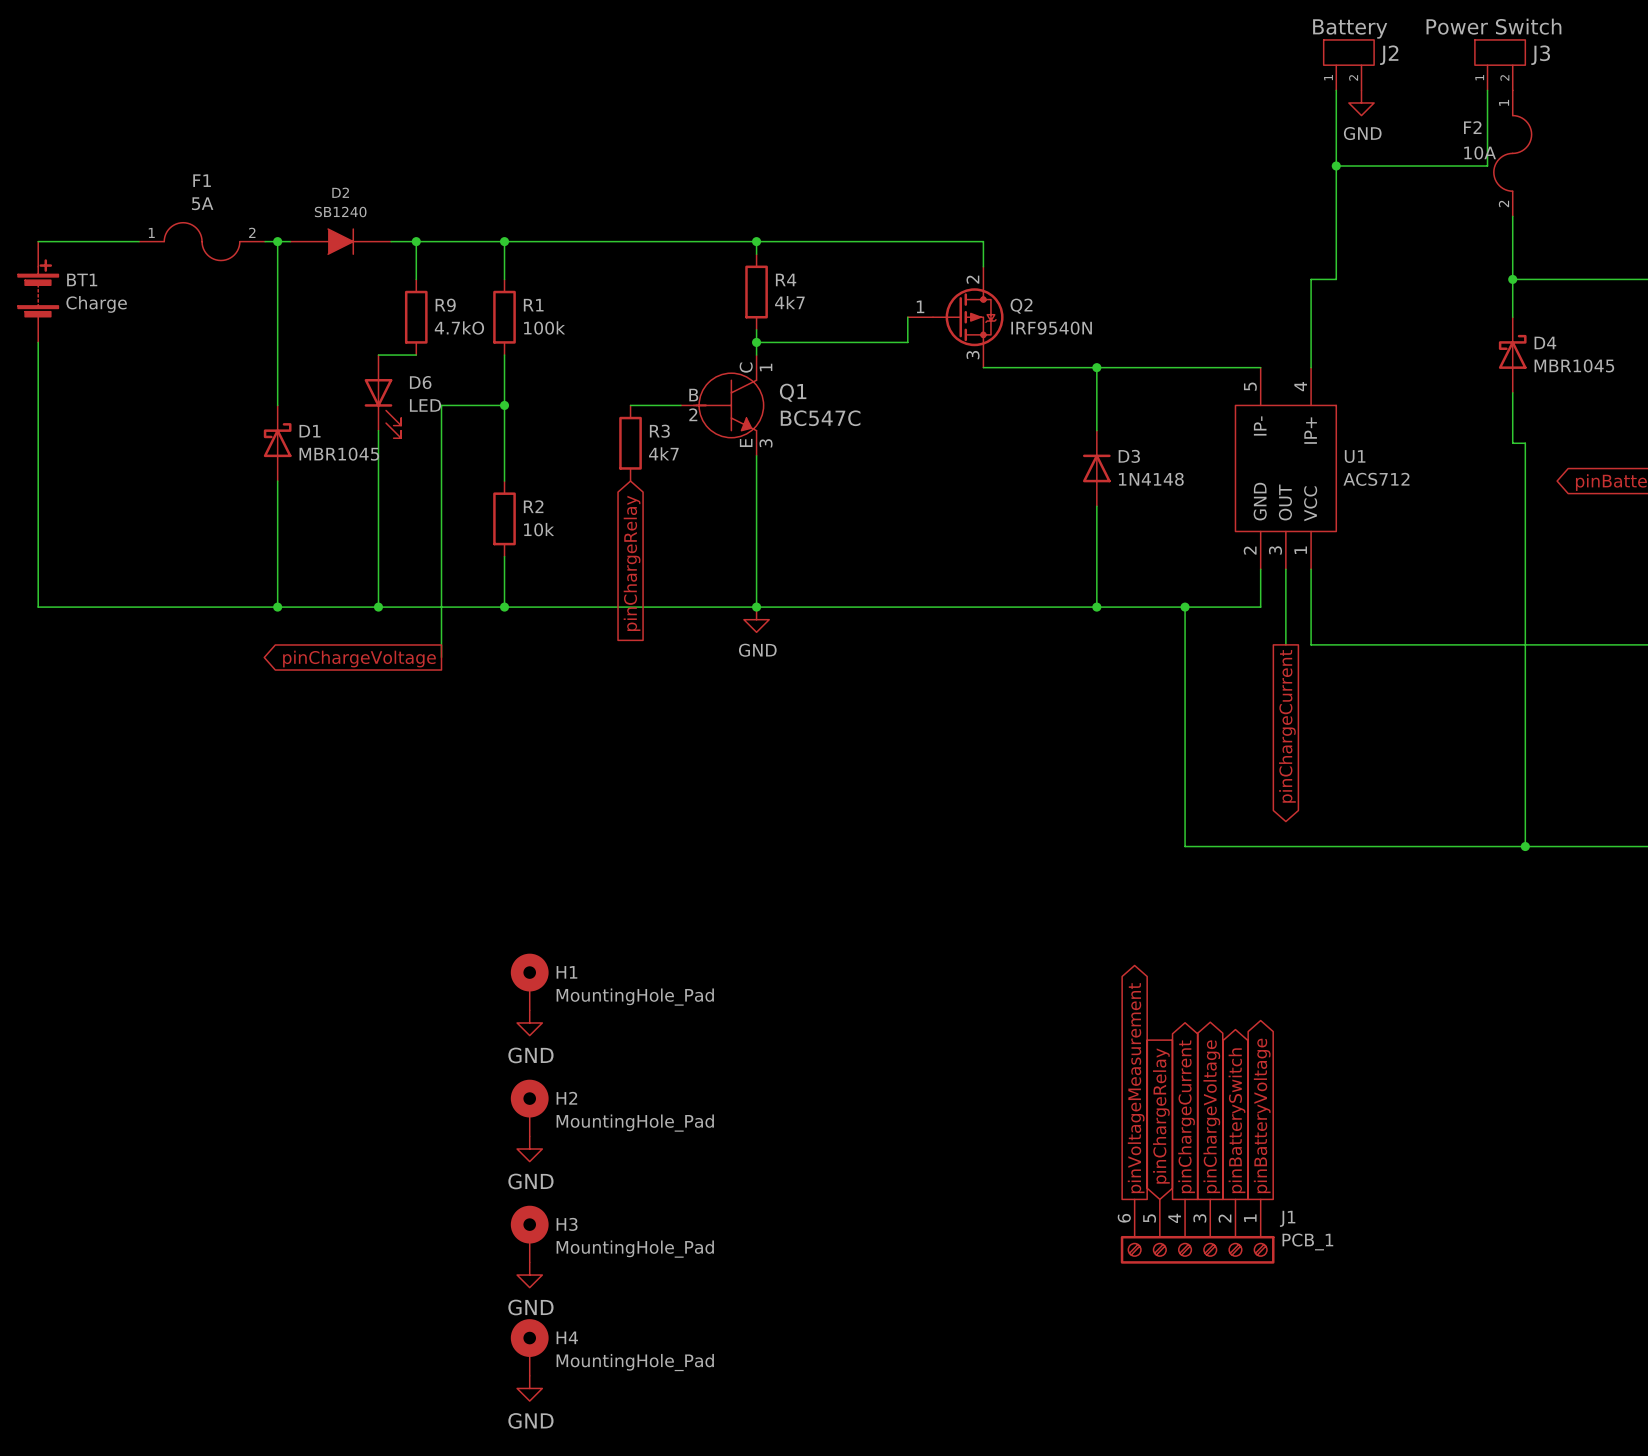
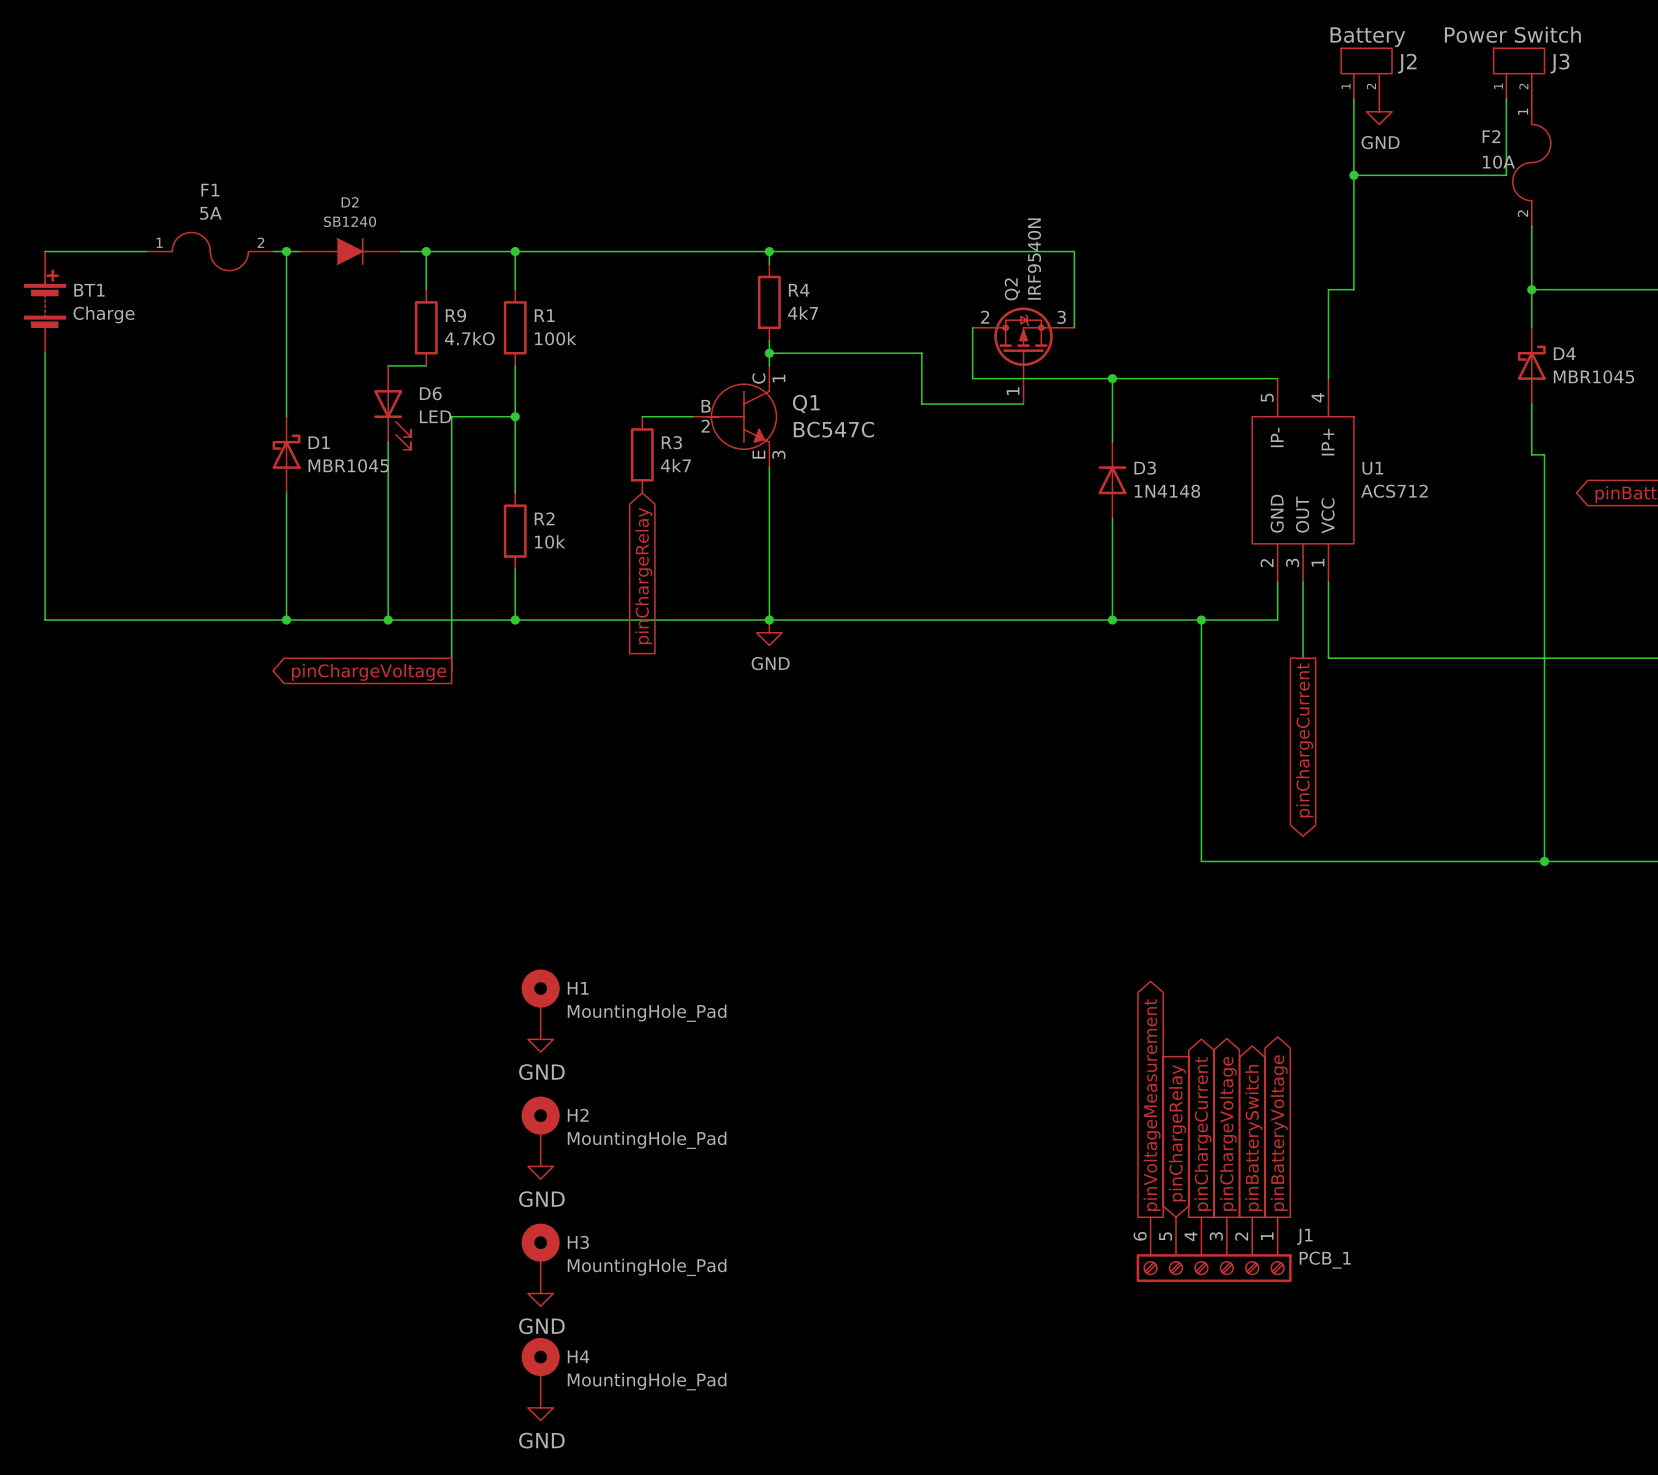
wire: (983, 241) (983, 266) -> (998, 251) (1074, 251) (1074, 327)
wire: (907, 317) (907, 342) -> (1023, 404) (921, 404) (921, 353)
wire: none -> (972, 327) (972, 378) (998, 378)
Q2 rotation: 0° (968, 317) -> 90° counterclockwise (1023, 343)

